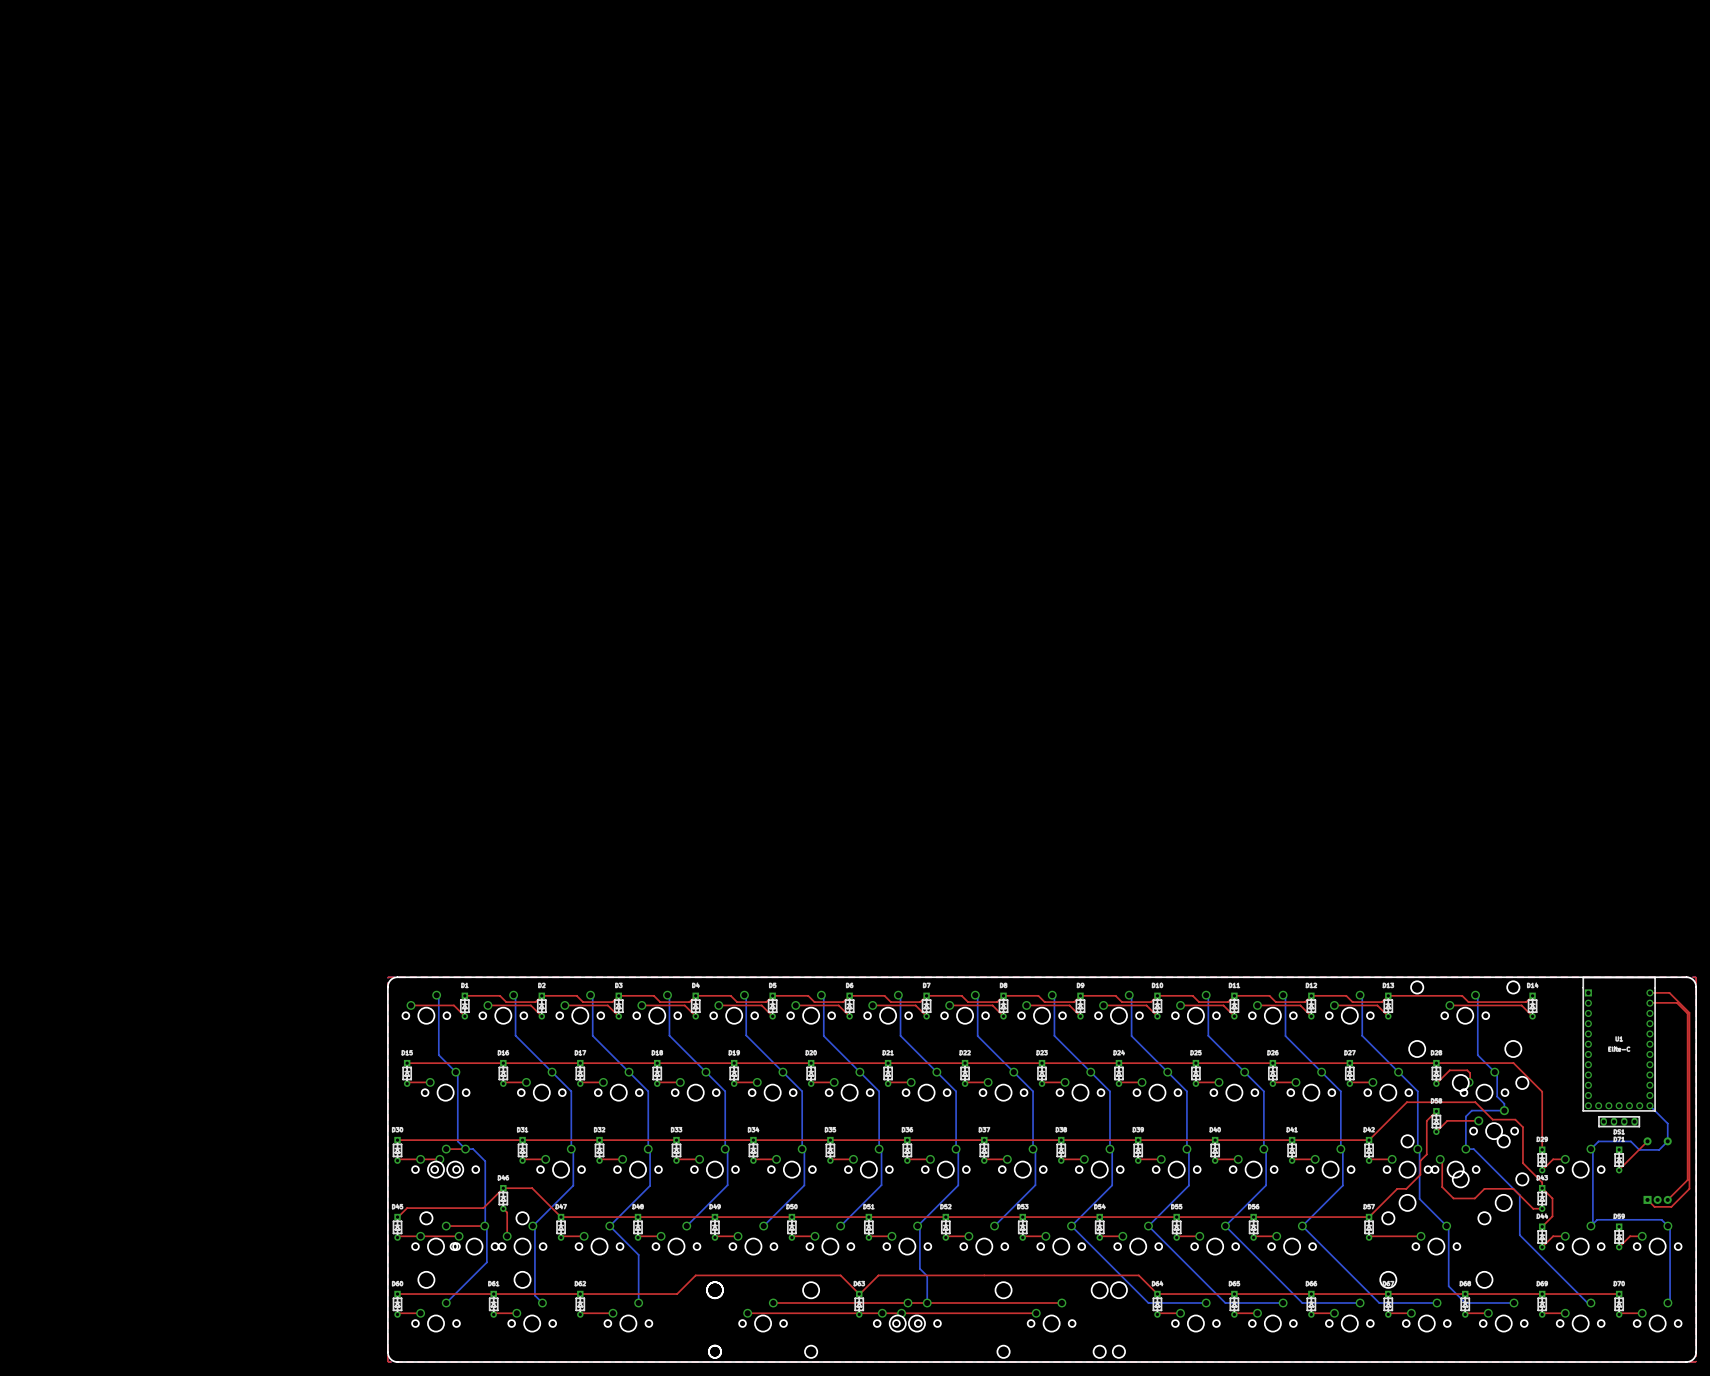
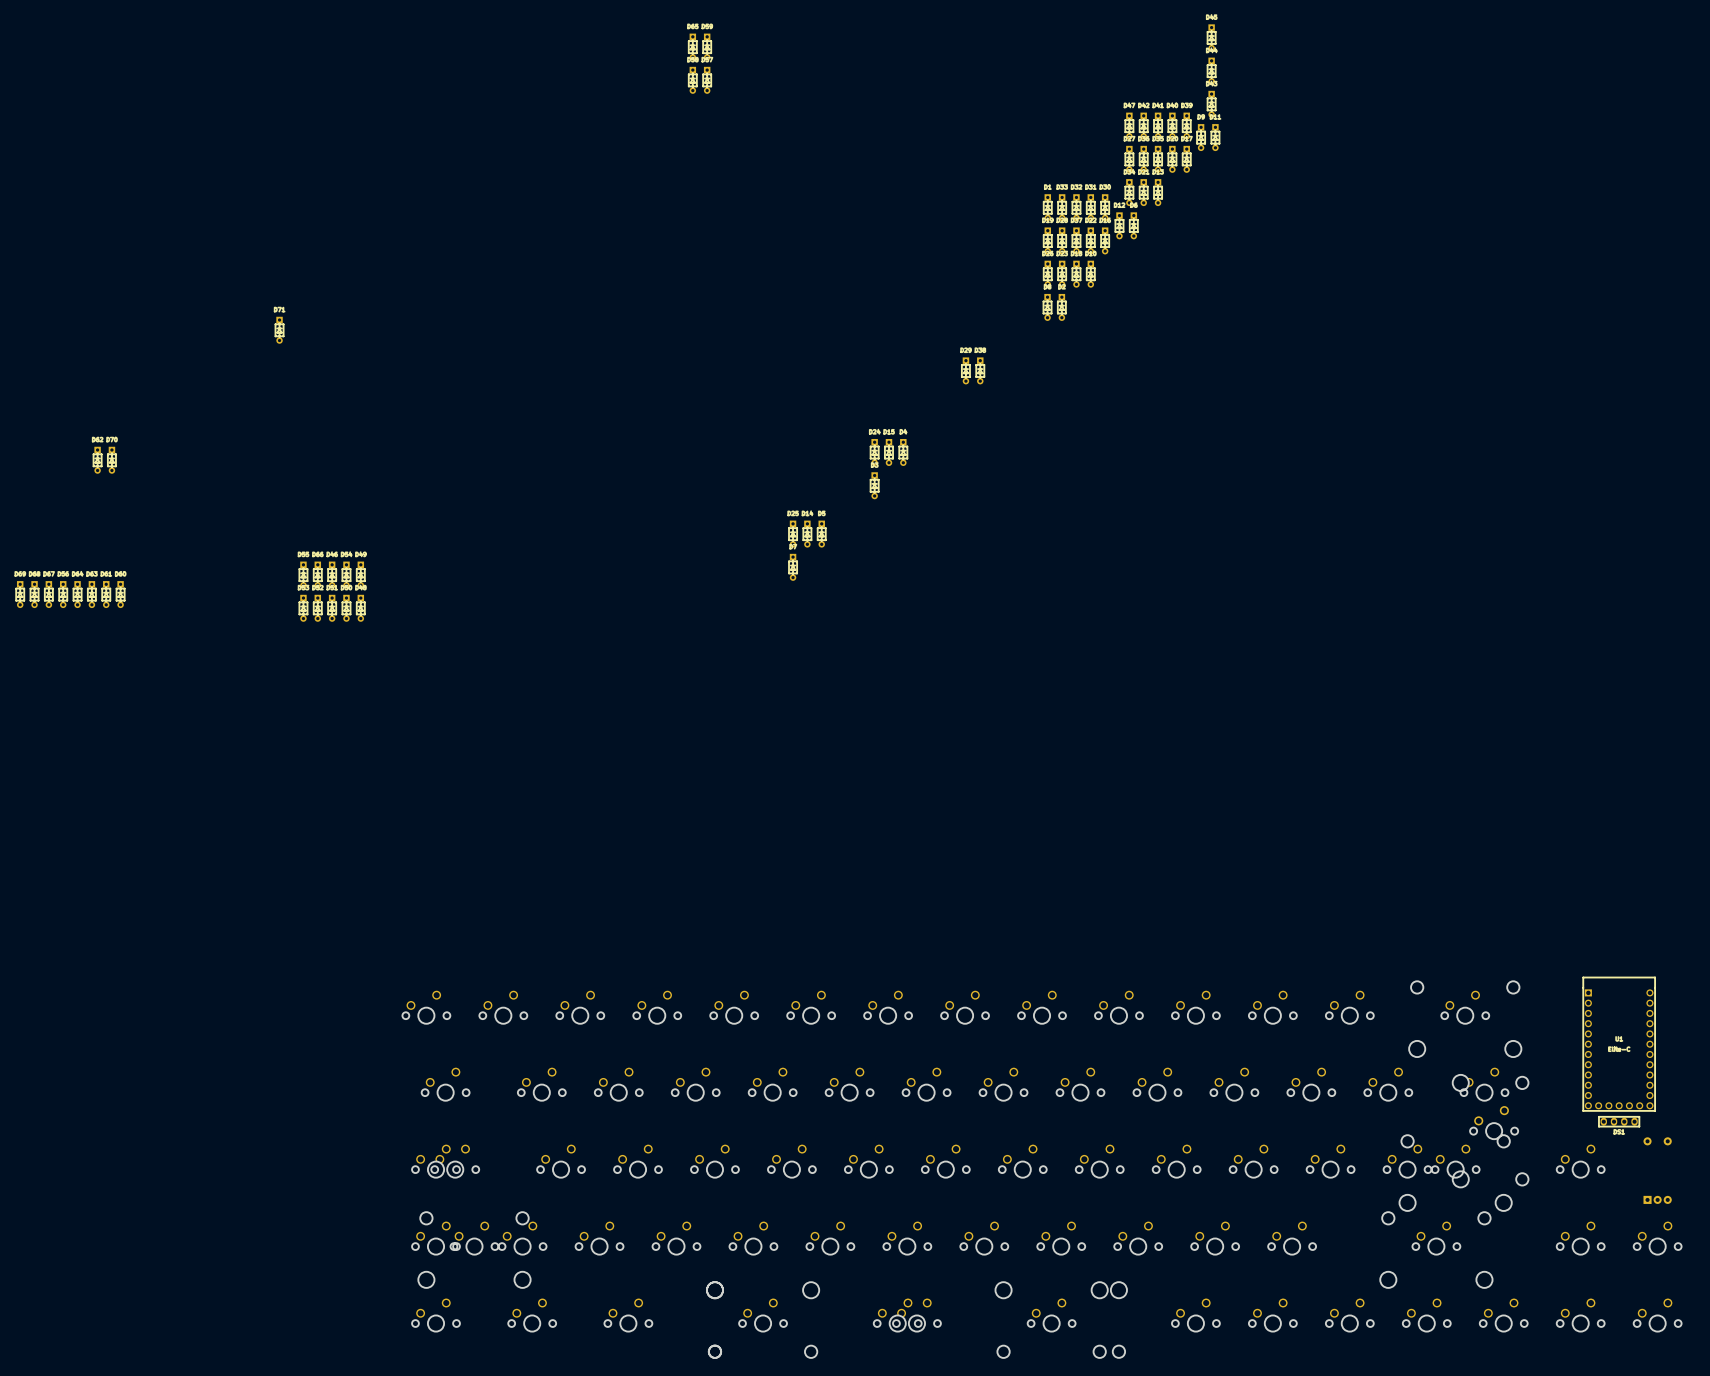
board edge: (397, 977) (1688, 977) (1694, 980) (1696, 986) (1695, 1354) (1692, 1360) (1686, 1362) (395, 1361) (389, 1358) (387, 1352) (387, 986) (390, 980) (397, 977) -> none
top track: (1649, 992) (1669, 992) (1689, 1012) (1689, 1188) (1671, 1206) (1654, 1206) (1647, 1199) -> none
bottom track: (436, 995) (438, 997) (438, 1055) (457, 1074) (457, 1141) (465, 1149) (473, 1149) (485, 1161) (484, 1226) (486, 1228) (486, 1262) (446, 1303) -> none
top track: (464, 995) (500, 995) (506, 1002) (535, 1002) (541, 995) (576, 995) (583, 1002) (612, 1002) (618, 995) (653, 995) (660, 1002) (689, 1002) (695, 995) (730, 995) (737, 1002) (766, 1002) (772, 995) (808, 995) (814, 1002) (843, 1002) (849, 995) (884, 995) (890, 1002) (920, 1002) (926, 995) (961, 995) (968, 1002) (997, 1002) (1003, 995) (1038, 995) (1044, 1002) (1074, 1002) (1080, 995) (1115, 995) (1121, 1002) (1151, 1002) (1157, 995) (1192, 995) (1199, 1002) (1228, 1002) (1234, 995) (1269, 995) (1275, 1002) (1305, 1002) (1311, 995) (1346, 995) (1352, 1002) (1382, 1002) (1388, 995) (1462, 995) (1468, 1002) (1526, 1002) (1532, 995) -> none
bottom track: (513, 995) (515, 997) (515, 1035) (571, 1091) (573, 1185) (532, 1226) (534, 1228) (534, 1295) (542, 1303) -> none
bottom track: (590, 995) (592, 997) (592, 1035) (648, 1091) (650, 1185) (609, 1226) (638, 1254) (638, 1303) -> none
bottom track: (667, 995) (669, 997) (669, 1035) (725, 1091) (727, 1185) (686, 1226) -> none
bottom track: (744, 995) (746, 996) (746, 1035) (802, 1091) (804, 1185) (763, 1226) -> none
bottom track: (821, 995) (823, 997) (823, 1036) (879, 1091) (881, 1185) (840, 1226) -> none
bottom track: (898, 995) (900, 997) (900, 1035) (956, 1091) (958, 1185) (917, 1226) (919, 1228) (919, 1268) (927, 1276) (927, 1303) -> none
bottom track: (975, 995) (977, 997) (977, 1036) (1033, 1091) (1035, 1185) (994, 1226) -> none
bottom track: (1052, 995) (1054, 997) (1054, 1035) (1109, 1091) (1112, 1185) (1071, 1226) (1148, 1303) (1206, 1303) -> none
bottom track: (1129, 995) (1131, 997) (1131, 1036) (1186, 1091) (1188, 1185) (1148, 1226) (1225, 1303) (1283, 1303) -> none
bottom track: (1206, 995) (1208, 997) (1208, 1035) (1263, 1091) (1266, 1185) (1225, 1226) (1302, 1303) (1360, 1303) -> none
bottom track: (1283, 995) (1285, 997) (1285, 1036) (1340, 1091) (1342, 1185) (1302, 1226) (1379, 1303) (1437, 1303) -> none
bottom track: (1360, 995) (1362, 997) (1362, 1035) (1417, 1091) (1419, 1199) (1448, 1228) (1448, 1286) (1465, 1303) (1513, 1303) -> none
bottom track: (1475, 995) (1477, 997) (1477, 1055) (1497, 1074) (1497, 1096) (1504, 1103) (1504, 1110) (1471, 1110) (1465, 1116) (1465, 1149) (1473, 1149) (1519, 1195) (1519, 1235) (1587, 1303) (1590, 1303) -> none
top track: (1649, 1003) (1676, 1002) (1687, 1013) (1687, 1180) (1667, 1199) -> none
top track: (410, 1005) (453, 1005) (464, 1016) -> none
top track: (487, 1005) (530, 1005) (541, 1016) -> none
top track: (564, 1005) (607, 1005) (618, 1016) -> none
top track: (641, 1005) (684, 1005) (695, 1016) -> none
top track: (718, 1005) (761, 1005) (772, 1016) -> none
top track: (795, 1005) (838, 1005) (849, 1016) -> none
top track: (872, 1005) (915, 1005) (926, 1016) -> none
top track: (949, 1005) (992, 1005) (1003, 1016) -> none
top track: (1026, 1005) (1069, 1005) (1080, 1016) -> none
top track: (1103, 1005) (1146, 1005) (1157, 1016) -> none
top track: (1180, 1005) (1223, 1005) (1234, 1016) -> none
top track: (1257, 1005) (1300, 1005) (1311, 1016) -> none
top track: (1334, 1005) (1377, 1005) (1388, 1016) -> none
top track: (1449, 1005) (1521, 1005) (1532, 1016) -> none
part position: (464, 1006) -> (1047, 207)
part position: (541, 1006) -> (1061, 307)
part position: (618, 1006) -> (874, 485)
part position: (695, 1006) -> (903, 452)
part position: (772, 1006) -> (821, 534)
part position: (849, 1006) -> (1133, 225)
part position: (926, 1006) -> (793, 567)
part position: (1003, 1006) -> (1047, 307)
part position: (1080, 1006) -> (1201, 137)
part position: (1157, 1006) -> (1090, 274)
part position: (1234, 1006) -> (1215, 137)
part position: (1311, 1006) -> (1119, 225)
part position: (1388, 1006) -> (1158, 192)
part position: (1532, 1006) -> (807, 534)
top track: (407, 1063) (1513, 1063) (1542, 1091) (1542, 1149) -> none
part position: (407, 1073) -> (888, 452)
part position: (503, 1073) -> (1105, 240)
part position: (580, 1073) -> (1186, 159)
part position: (657, 1073) -> (1076, 274)
part position: (734, 1073) -> (1047, 240)
part position: (811, 1073) -> (1172, 159)
part position: (888, 1073) -> (1143, 192)
part position: (965, 1073) -> (1090, 240)
part position: (1042, 1073) -> (1062, 274)
part position: (1118, 1073) -> (874, 452)
part position: (1195, 1073) -> (793, 534)
part position: (1272, 1073) -> (1047, 274)
part position: (1349, 1073) -> (1129, 159)
part position: (1436, 1073) -> (1062, 240)
top track: (430, 1082) (407, 1083) -> none
top track: (526, 1082) (503, 1083) -> none
top track: (603, 1082) (580, 1083) -> none
top track: (680, 1082) (657, 1083) -> none
top track: (757, 1082) (734, 1083) -> none
top track: (834, 1082) (811, 1083) -> none
top track: (911, 1082) (888, 1083) -> none
top track: (988, 1082) (965, 1083) -> none
top track: (1065, 1082) (1042, 1083) -> none
top track: (1142, 1082) (1118, 1083) -> none
top track: (1219, 1082) (1195, 1083) -> none
top track: (1295, 1082) (1272, 1083) -> none
top track: (1372, 1082) (1349, 1083) -> none
top track: (1470, 1082) (1470, 1073) (1467, 1070) (1449, 1070) (1436, 1083) -> none
bottom track: (1649, 1105) (1667, 1123) (1667, 1141) (1659, 1149) (1639, 1149) (1630, 1141) (1598, 1141) (1590, 1149) (1592, 1151) (1592, 1224) -> none
top track: (1436, 1111) (1426, 1120) (1426, 1154) (1420, 1160) (1420, 1174) (1406, 1188) (1397, 1188) (1369, 1217) (561, 1217) (532, 1188) (503, 1188) (483, 1208) (407, 1208) (397, 1217) -> none
top track: (1478, 1120) (1447, 1120) (1436, 1131) -> none
part position: (1436, 1121) -> (692, 80)
top track: (397, 1140) (1369, 1140) (1406, 1102) (1475, 1102) (1492, 1119) (1515, 1119) (1522, 1127) (1522, 1163) (1542, 1182) (1542, 1188) (1552, 1198) (1552, 1216) (1542, 1226) -> none
top track: (1647, 1141) (1619, 1170) -> none
top track: (446, 1149) (465, 1149) -> none
part position: (397, 1150) -> (1105, 207)
part position: (522, 1150) -> (1090, 207)
part position: (599, 1150) -> (1076, 207)
part position: (676, 1150) -> (1062, 207)
part position: (753, 1150) -> (1129, 192)
part position: (830, 1150) -> (1158, 159)
part position: (907, 1150) -> (1143, 159)
part position: (984, 1150) -> (1076, 240)
part position: (1061, 1150) -> (980, 370)
part position: (1138, 1150) -> (1186, 126)
part position: (1215, 1150) -> (1172, 126)
part position: (1292, 1150) -> (1158, 126)
part position: (1369, 1150) -> (1143, 126)
top track: (439, 1159) (397, 1160) -> none
top track: (545, 1159) (522, 1160) -> none
top track: (622, 1159) (599, 1160) -> none
top track: (699, 1159) (676, 1160) -> none
top track: (776, 1159) (753, 1160) -> none
top track: (853, 1159) (830, 1160) -> none
top track: (930, 1159) (907, 1160) -> none
top track: (1007, 1159) (984, 1160) -> none
top track: (1084, 1159) (1061, 1160) -> none
top track: (1161, 1159) (1138, 1160) -> none
top track: (1238, 1159) (1215, 1160) -> none
top track: (1315, 1159) (1292, 1160) -> none
top track: (1392, 1159) (1369, 1160) -> none
top track: (1440, 1159) (1442, 1161) (1442, 1187) (1453, 1198) (1474, 1198) (1484, 1188) (1513, 1188) (1533, 1208) (1542, 1208) -> none
part position: (1542, 1159) -> (965, 370)
top track: (1565, 1159) (1553, 1159) (1542, 1170) -> none
part position: (1619, 1159) -> (279, 330)
part position: (503, 1198) -> (332, 575)
part position: (1542, 1198) -> (1211, 104)
top track: (503, 1208) (507, 1212) (507, 1236) -> none
top track: (446, 1226) (484, 1226) -> none
bottom track: (1590, 1226) (1597, 1219) (1661, 1219) (1670, 1228) (1670, 1300) (1667, 1303) -> none
part position: (397, 1227) -> (1211, 37)
part position: (561, 1227) -> (1129, 126)
part position: (638, 1227) -> (360, 608)
part position: (714, 1227) -> (360, 575)
part position: (791, 1227) -> (346, 608)
part position: (868, 1227) -> (332, 608)
part position: (945, 1227) -> (317, 608)
part position: (1022, 1227) -> (303, 608)
part position: (1099, 1227) -> (346, 575)
part position: (1176, 1227) -> (303, 575)
part position: (1253, 1227) -> (63, 594)
part position: (1369, 1227) -> (707, 80)
top track: (459, 1236) (397, 1237) -> none
top track: (584, 1236) (561, 1237) -> none
top track: (661, 1236) (638, 1237) -> none
top track: (738, 1236) (714, 1237) -> none
top track: (815, 1236) (791, 1237) -> none
top track: (891, 1236) (868, 1237) -> none
top track: (968, 1236) (945, 1237) -> none
top track: (1045, 1236) (1022, 1237) -> none
top track: (1122, 1236) (1099, 1237) -> none
top track: (1199, 1236) (1176, 1237) -> none
top track: (1276, 1236) (1253, 1237) -> none
top track: (1421, 1236) (1369, 1237) -> none
part position: (1542, 1236) -> (1211, 71)
top track: (1565, 1236) (1553, 1236) (1542, 1247) -> none
part position: (1619, 1236) -> (707, 47)
top track: (1642, 1236) (1630, 1236) (1619, 1247) -> none
top track: (397, 1294) (677, 1294) (695, 1275) (840, 1275) (859, 1294) (878, 1275) (1138, 1275) (1157, 1294) (1619, 1294) -> none
top track: (773, 1303) (1061, 1303) -> none
part position: (397, 1304) -> (120, 594)
part position: (493, 1304) -> (106, 594)
part position: (580, 1304) -> (97, 460)
part position: (859, 1304) -> (91, 594)
part position: (1157, 1304) -> (77, 594)
part position: (1234, 1304) -> (692, 47)
part position: (1311, 1304) -> (317, 575)
part position: (1388, 1304) -> (48, 594)
part position: (1465, 1304) -> (34, 594)
part position: (1542, 1304) -> (20, 594)
part position: (1619, 1304) -> (111, 460)
top track: (420, 1313) (397, 1314) -> none
top track: (516, 1313) (493, 1314) -> none
top track: (612, 1313) (580, 1314) -> none
top track: (747, 1313) (1036, 1313) -> none
top track: (1180, 1313) (1157, 1314) -> none
top track: (1257, 1313) (1234, 1314) -> none
top track: (1334, 1313) (1311, 1314) -> none
top track: (1411, 1313) (1388, 1314) -> none
top track: (1488, 1313) (1465, 1314) -> none
top track: (1565, 1313) (1542, 1314) -> none
top track: (1642, 1313) (1619, 1314) -> none

